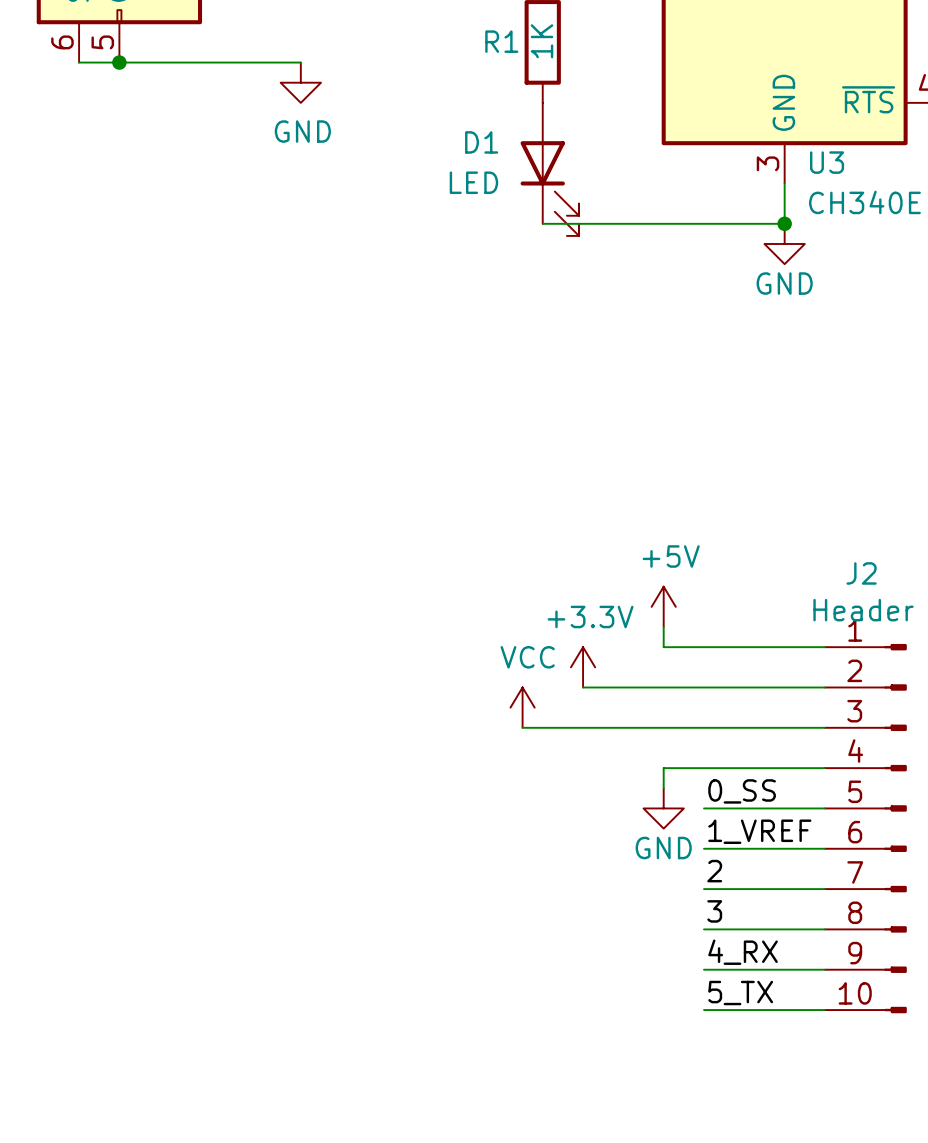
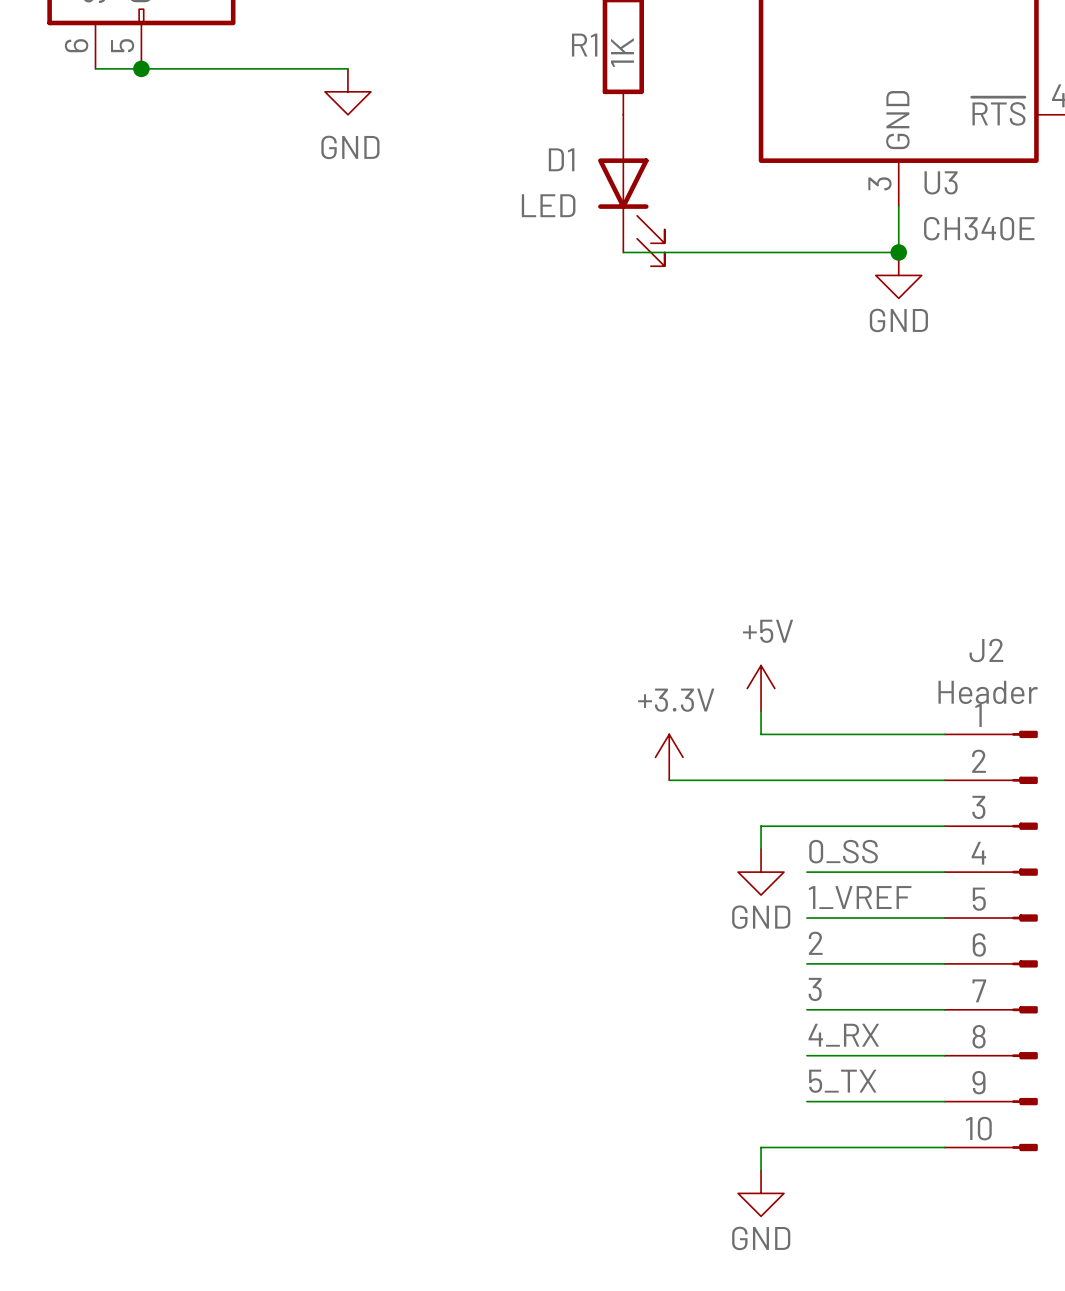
power symbol: VCC (522, 707) -> none
wire: (522, 727) (663, 727) -> (761, 849) (761, 826)
label: none -> 0_SS (843, 851)
wire: (704, 768) (663, 768) (663, 788) -> (806, 1147) (761, 1147) (761, 1170)
label: 0_SS (742, 791) -> 1_VREF (860, 897)
power symbol position: GND (663, 808) -> GND (761, 872)
label: 1_VREF (759, 831) -> 2 (815, 943)
label: 2 (714, 871) -> 3 (815, 989)
label: 3 (714, 911) -> 4_RX (843, 1035)
label: 4_RX (743, 952) -> 5_TX (842, 1081)
label: 5_TX (740, 993) -> none
power symbol: none -> GND (761, 1193)

